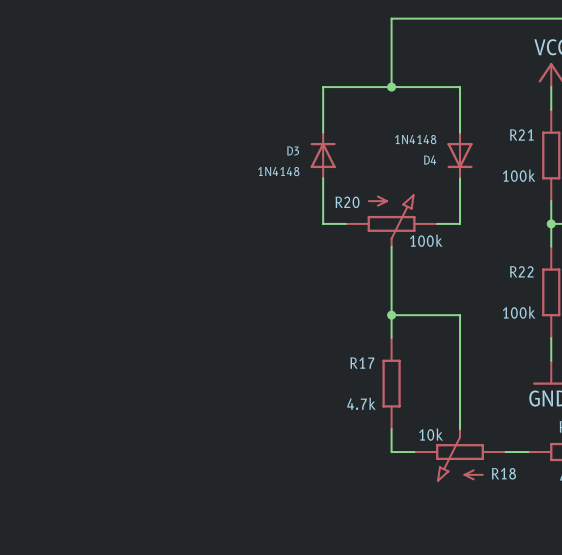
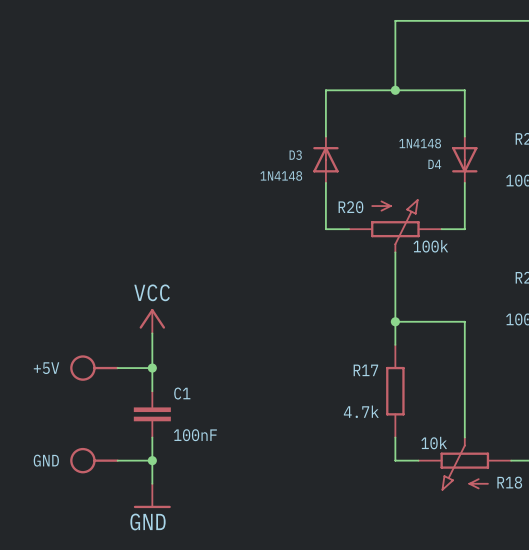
power symbol: none -> VCC (152, 321)
wire: none -> (152, 333) (152, 391)
+5V: none -> (94, 368)
wire: none -> (117, 368) (152, 368)
junction: none -> (152, 368)
C1: none -> 100nF (152, 414)
wire: none -> (152, 437) (152, 483)
GND: none -> (94, 460)
wire: none -> (117, 460) (152, 460)
junction: none -> (152, 460)
power symbol: none -> GND (152, 495)

